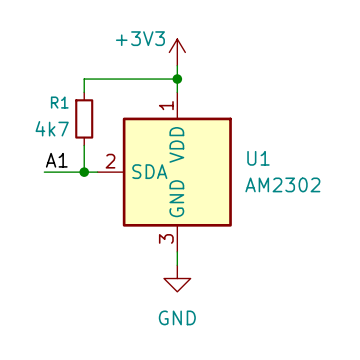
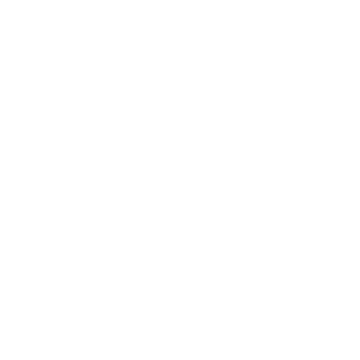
power symbol: +3V3 (177, 52) -> none
wire: (177, 65) (177, 92) -> none
wire: (177, 79) (84, 79) (84, 92) -> none
junction: (177, 79) -> none
R1: 4k7 (84, 118) -> none
wire: (84, 145) (84, 172) -> none
label: A1 (56, 160) -> none
wire: (44, 172) (97, 172) -> none
junction: (84, 172) -> none
U1: AM2302 (164, 172) -> none
wire: (177, 251) (177, 265) -> none
power symbol: GND (177, 278) -> none

